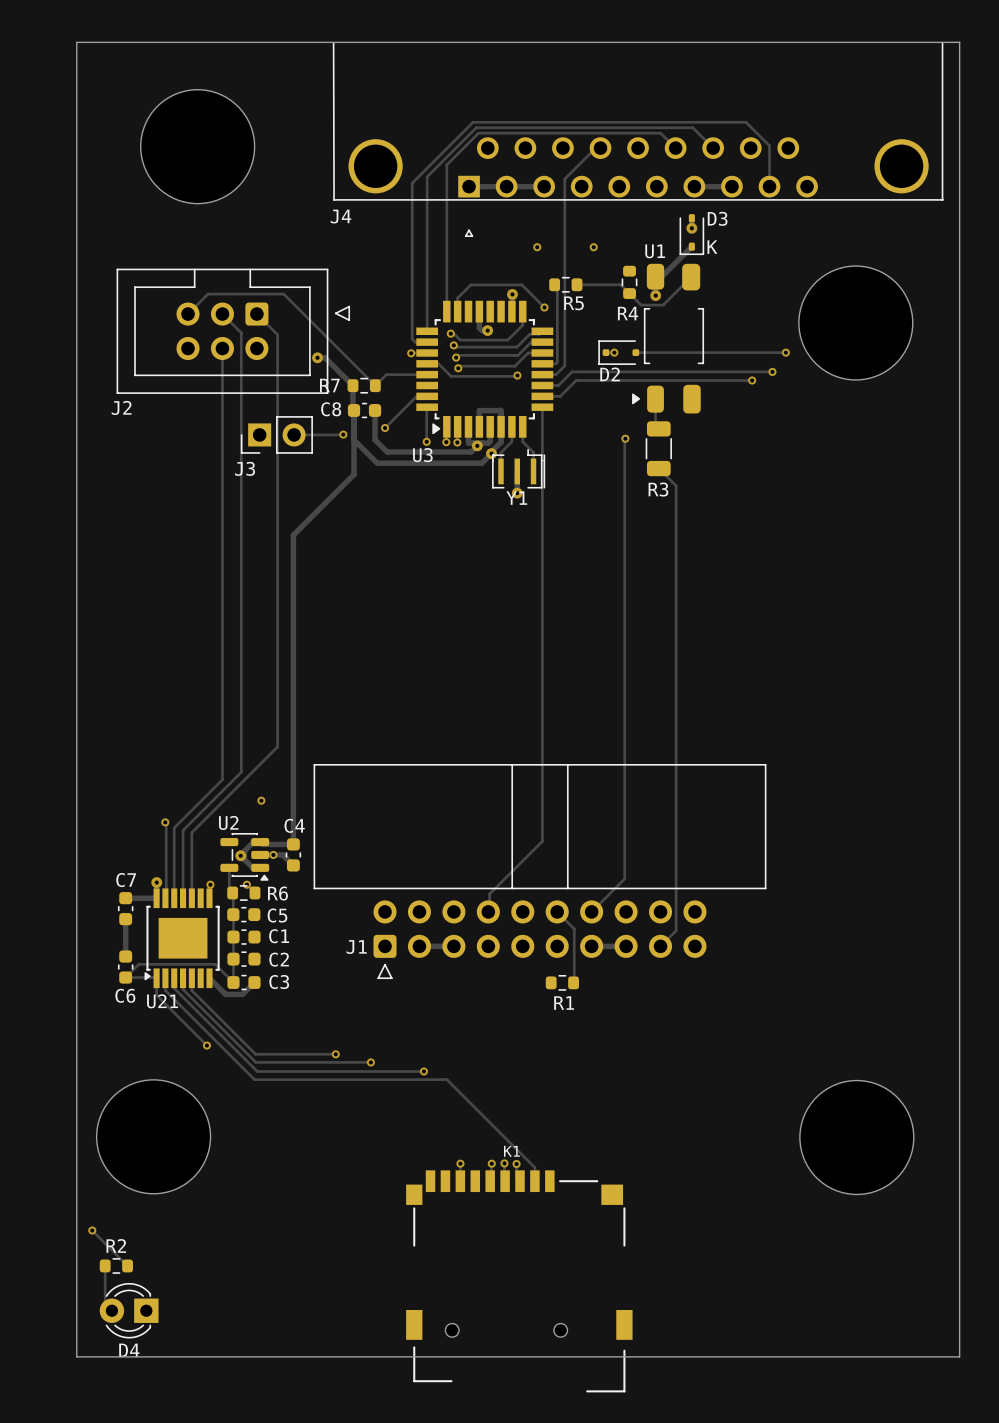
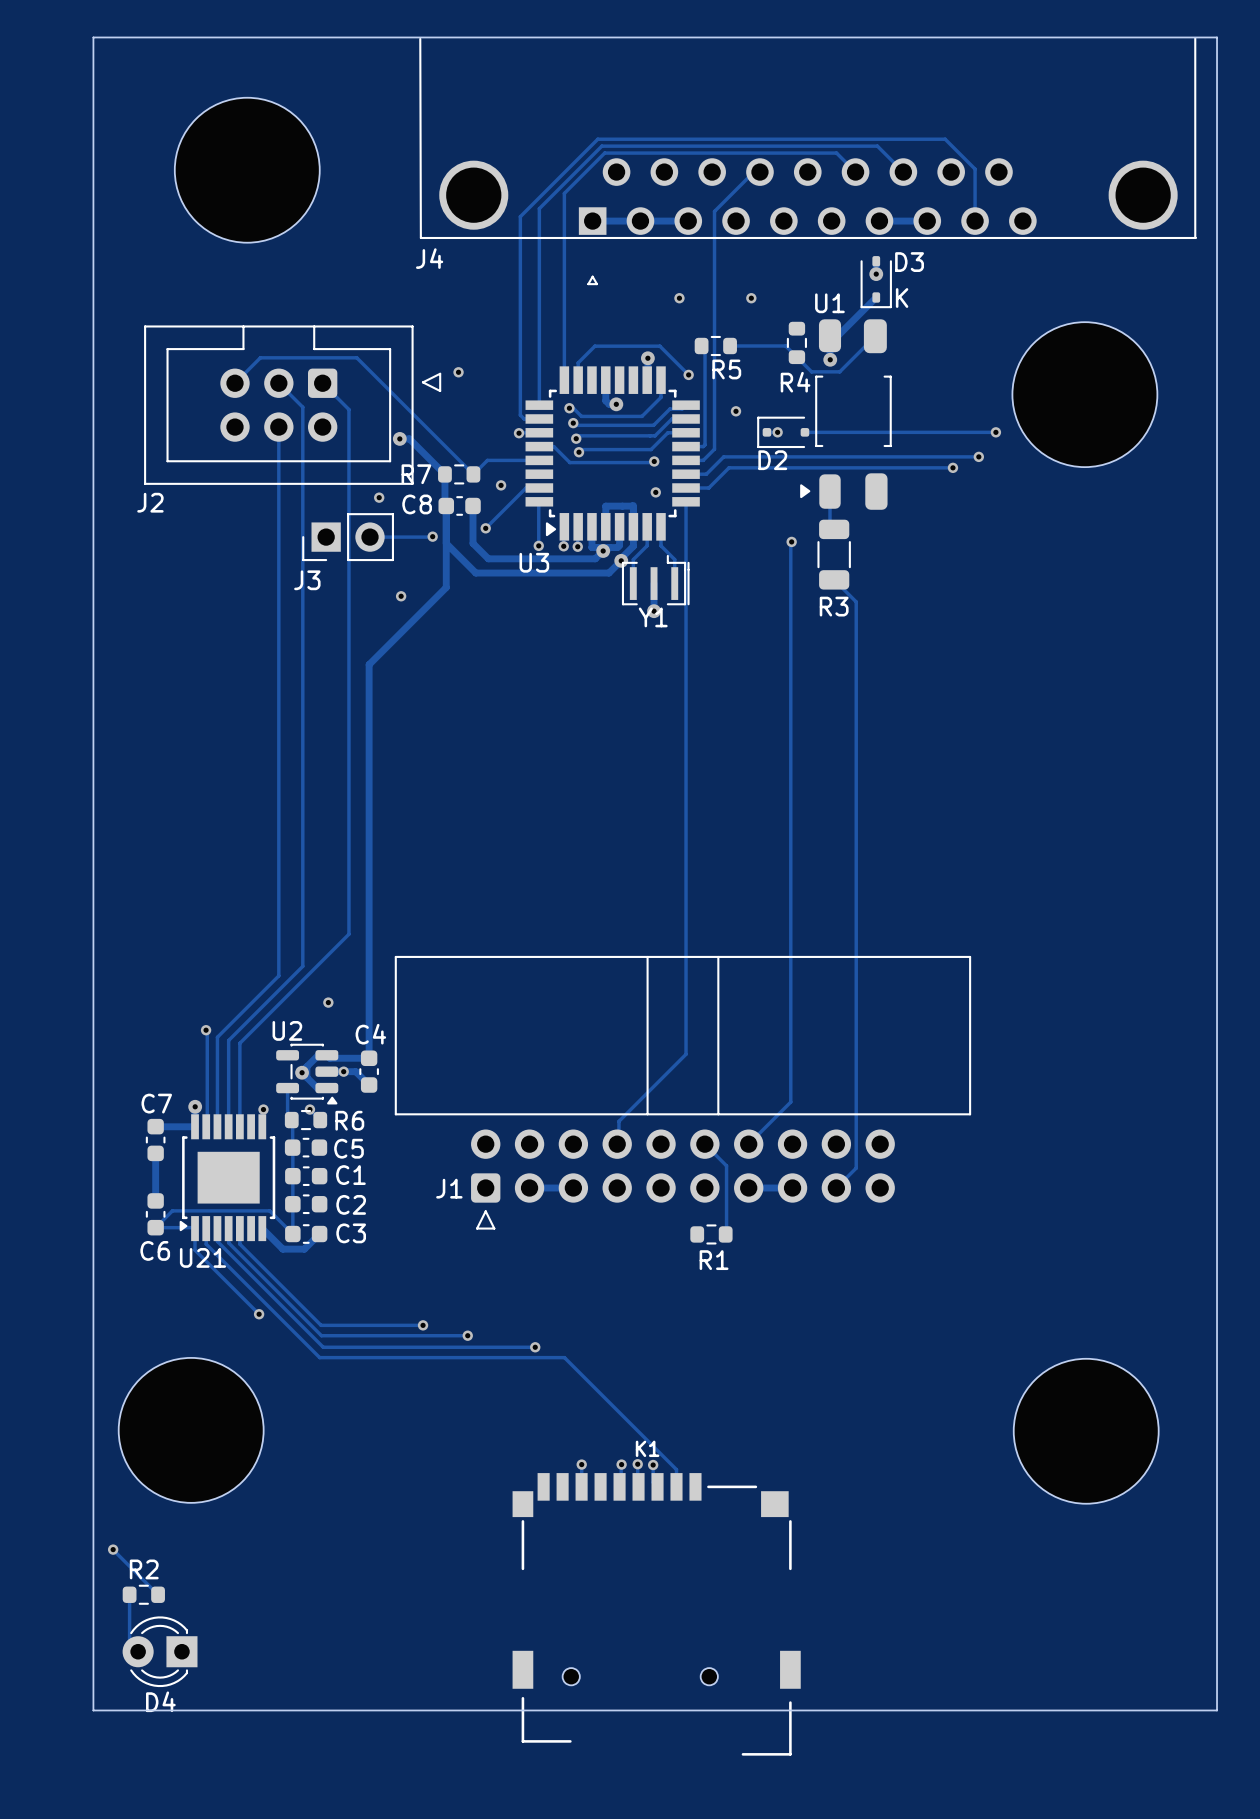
via: none -> (458, 372)
via: none -> (735, 411)
via: none -> (501, 485)
via: none -> (655, 492)
via: none -> (379, 497)
via: none -> (401, 596)

